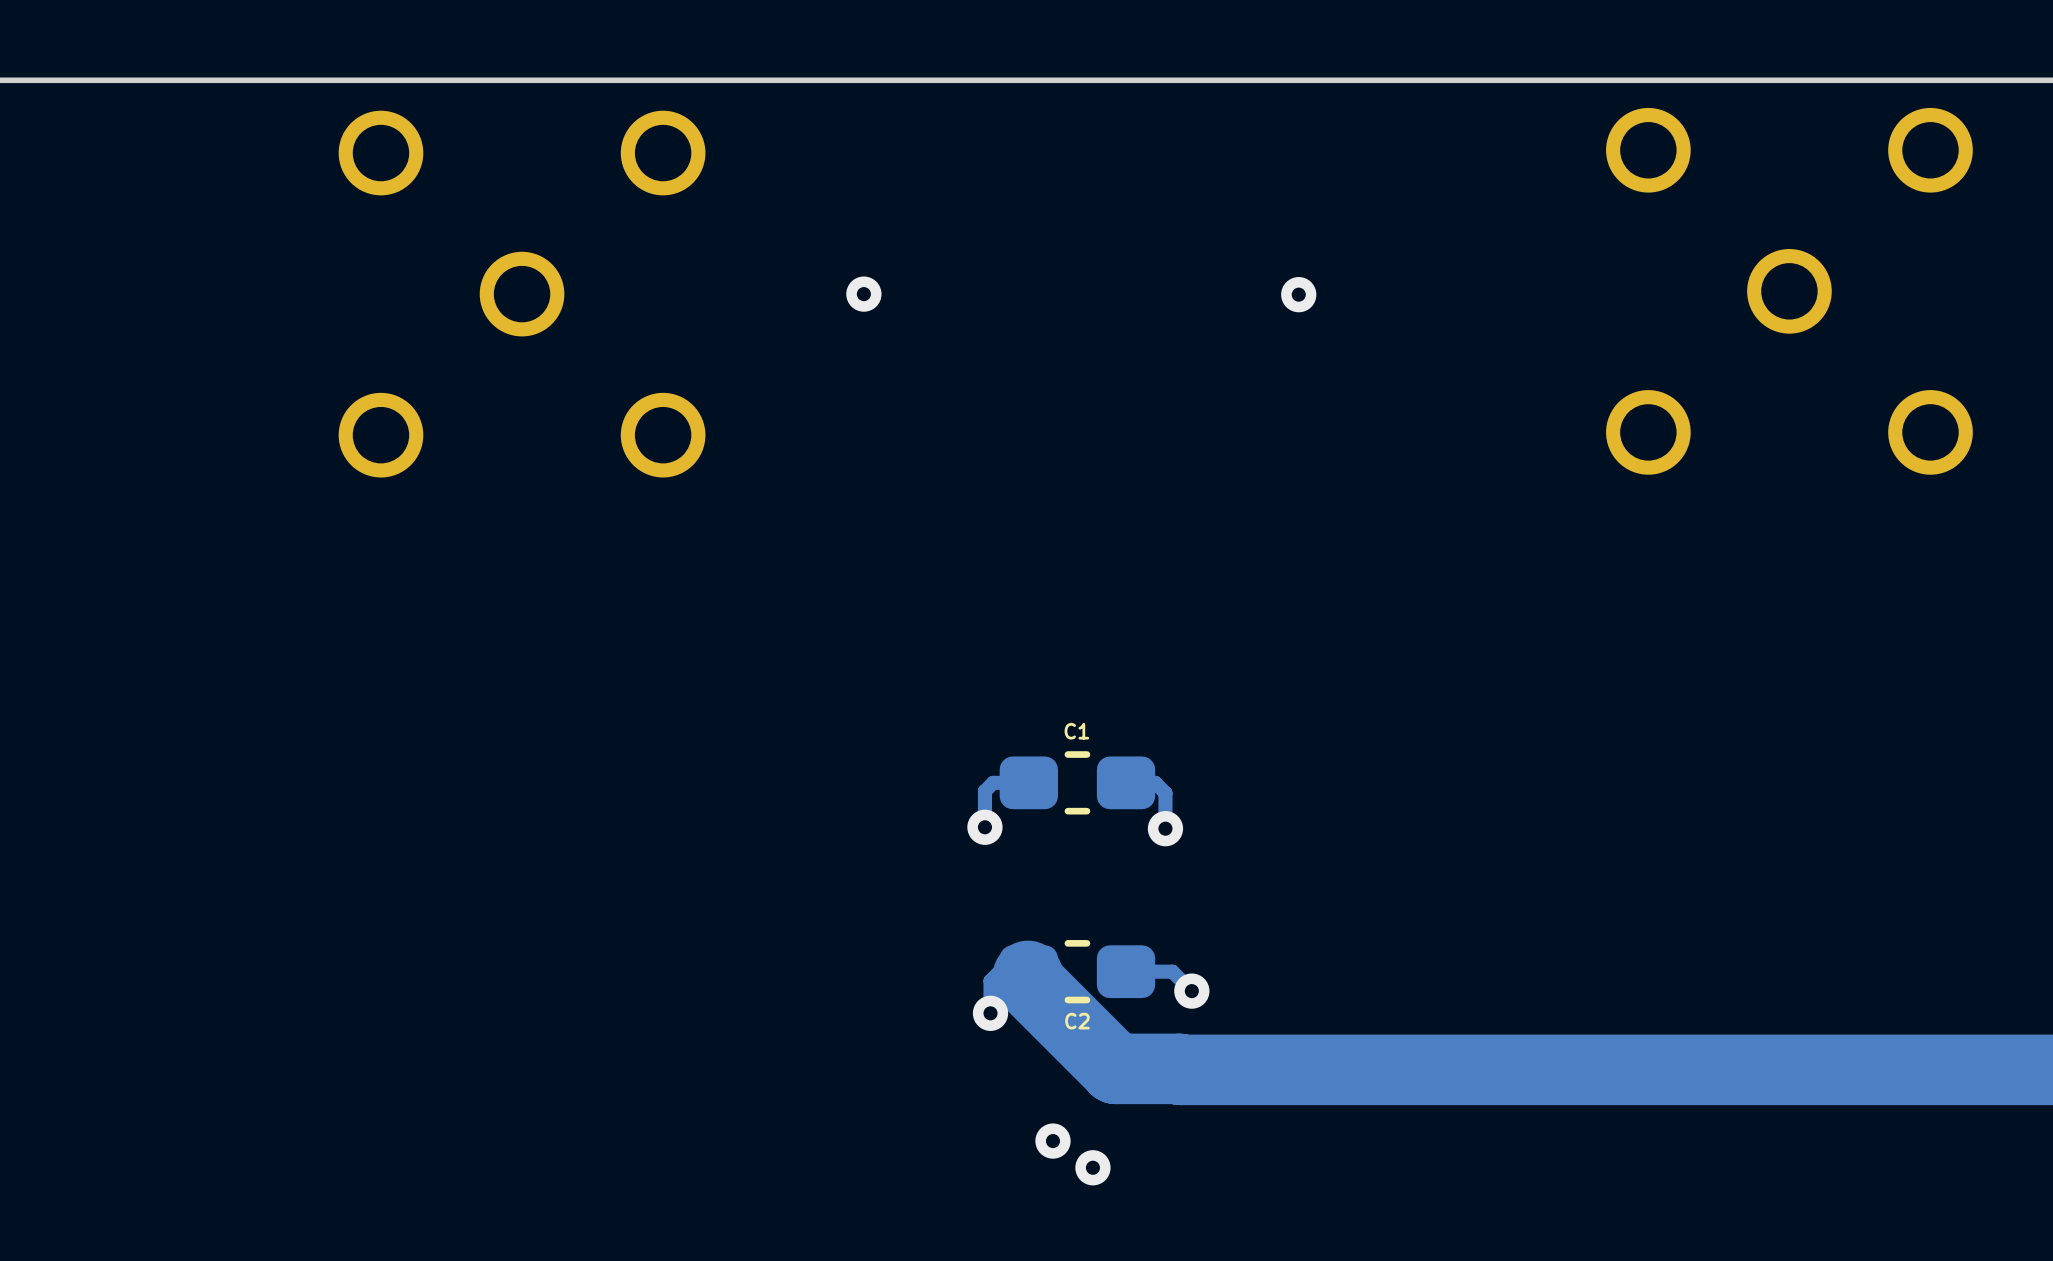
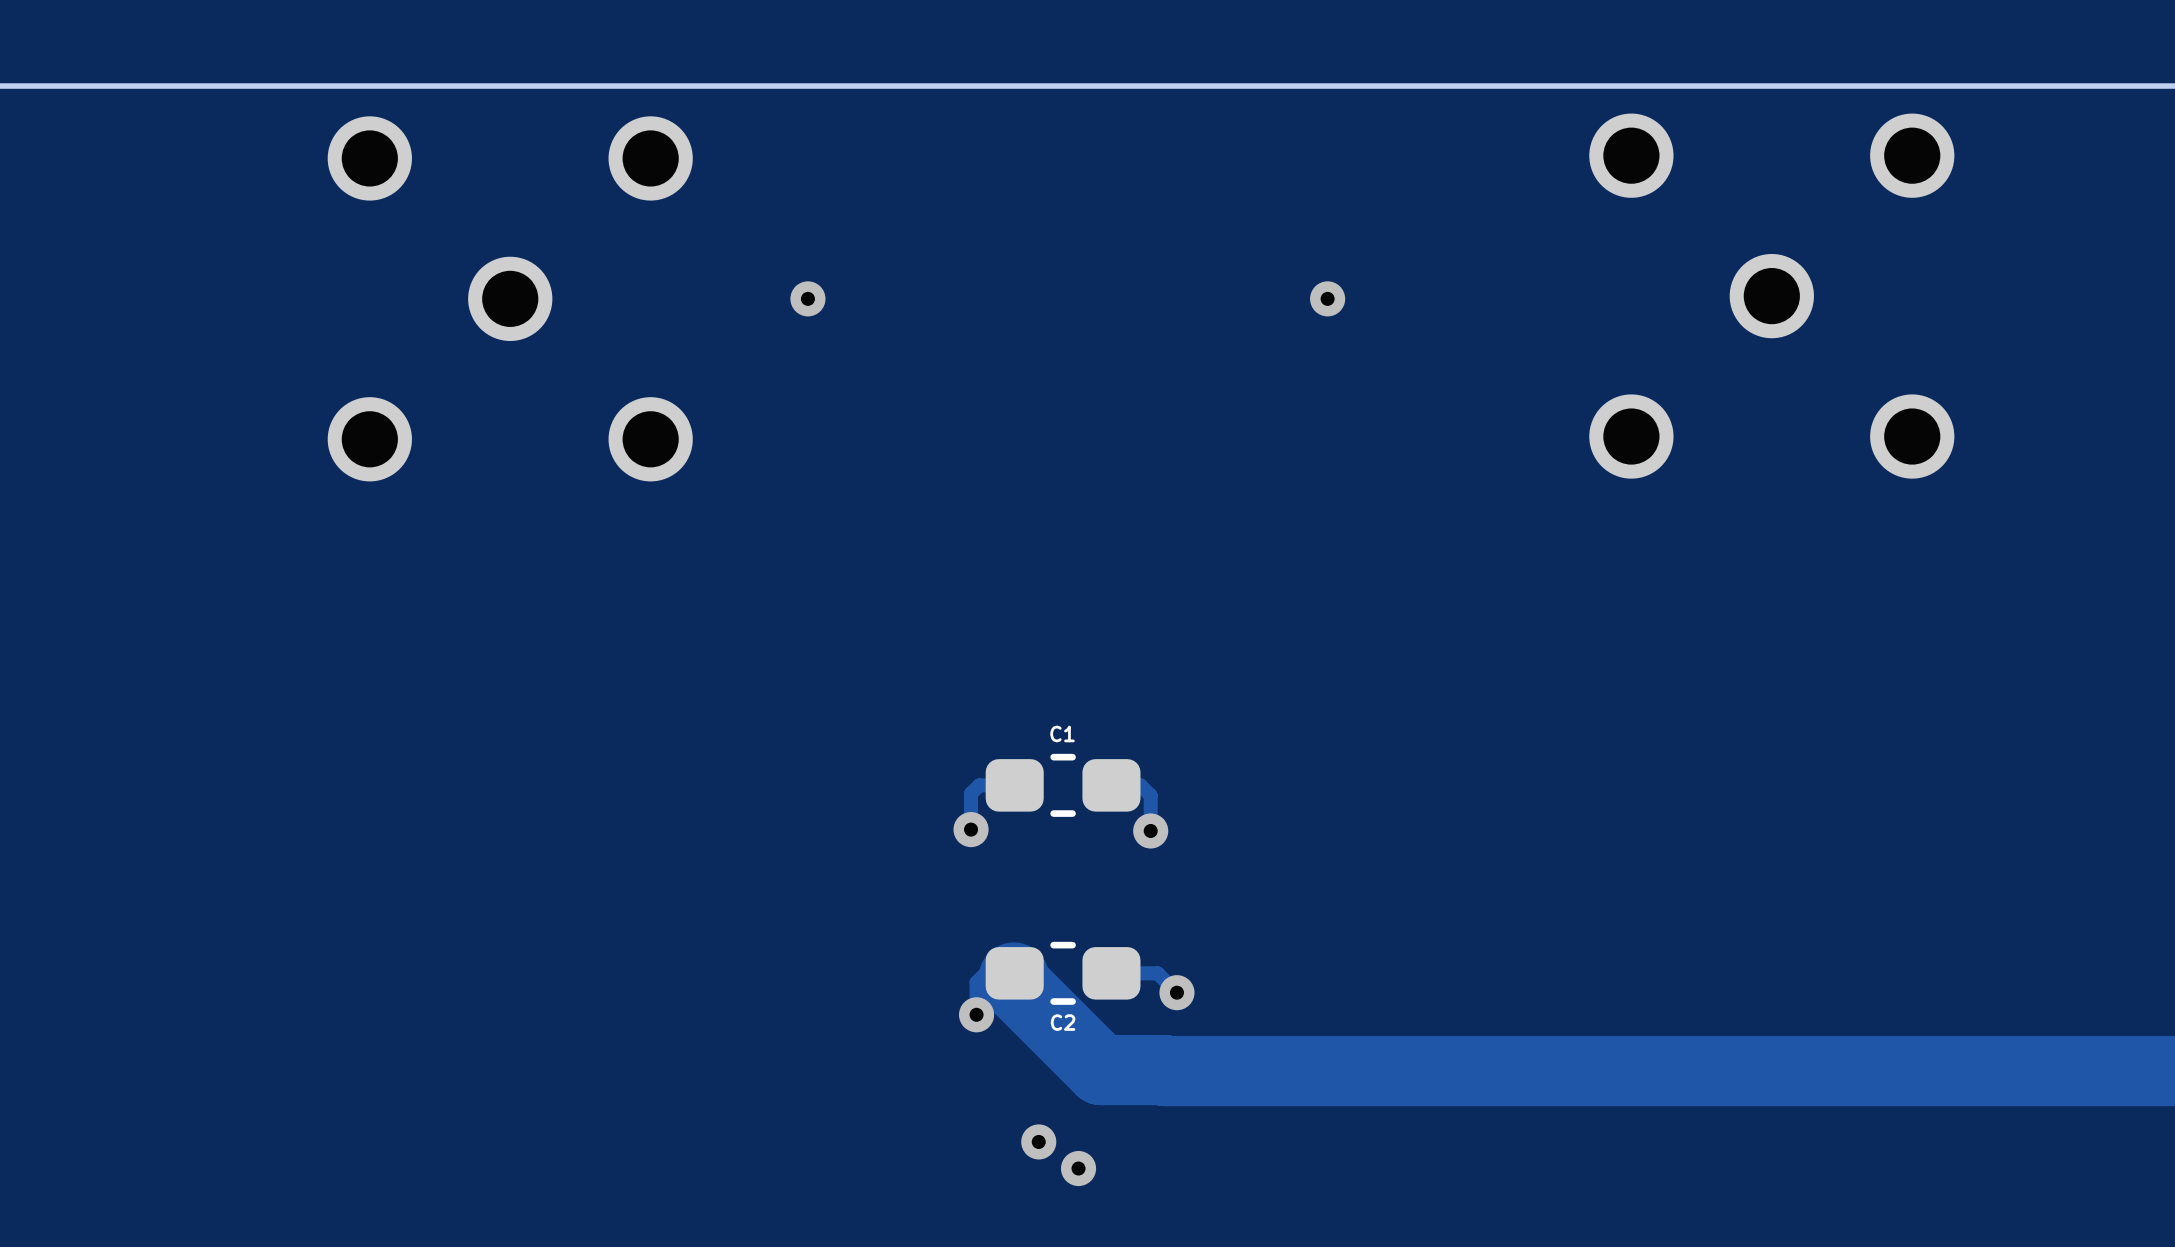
via position: (863, 294) -> (807, 298)
via position: (1298, 294) -> (1327, 298)

